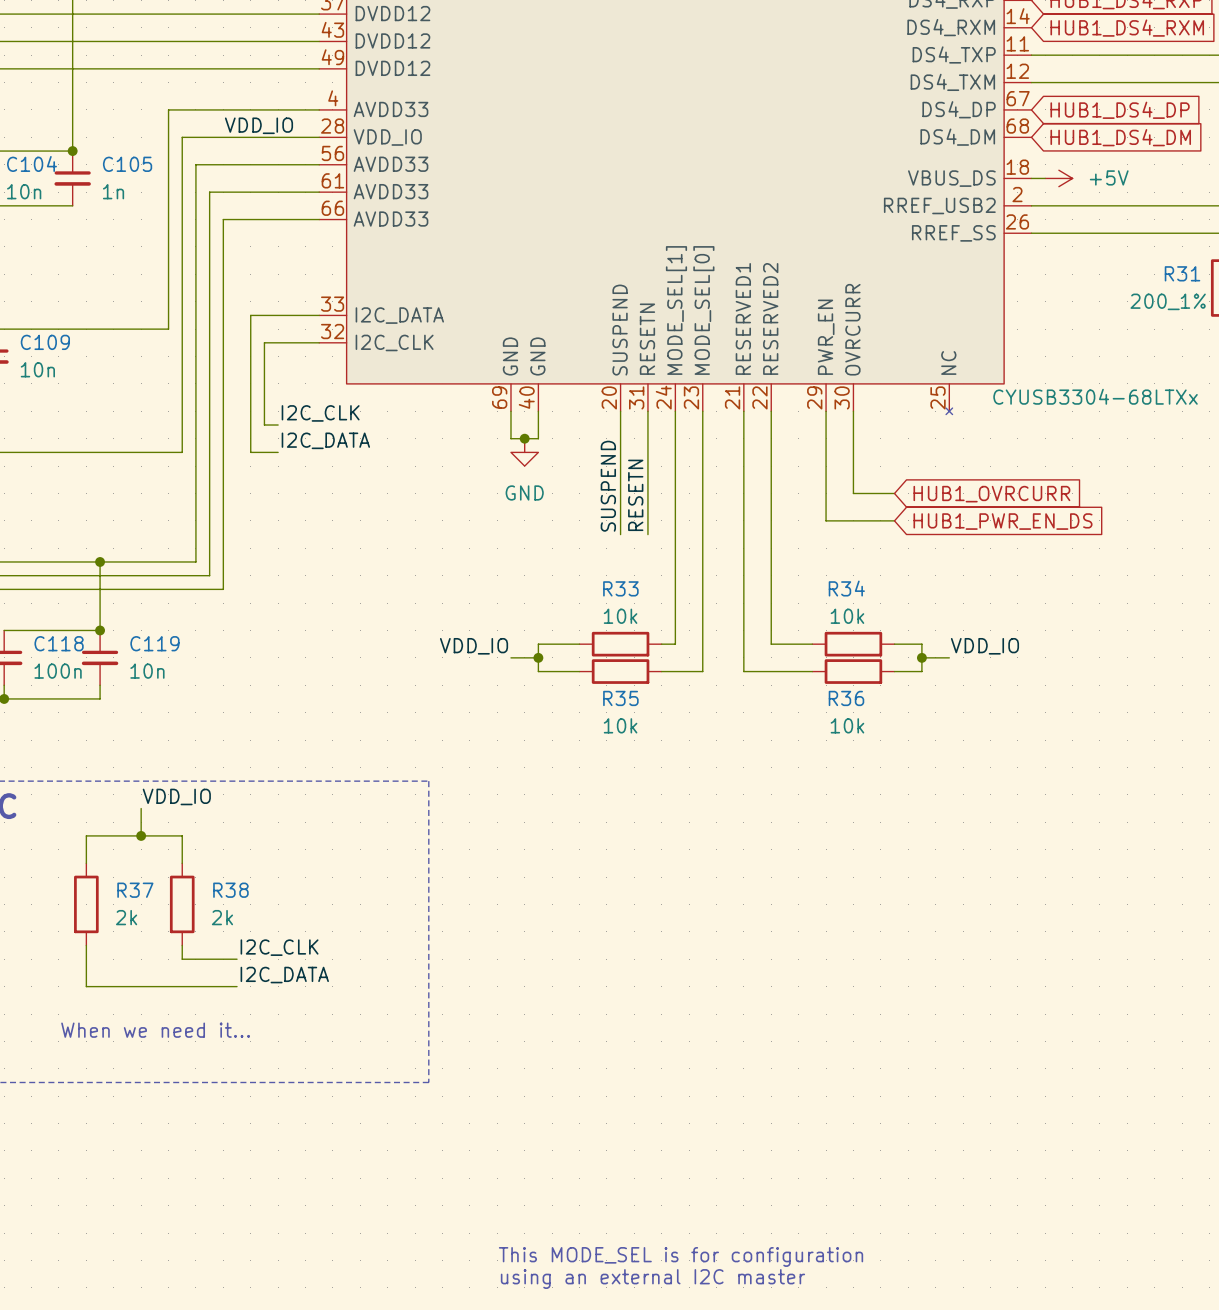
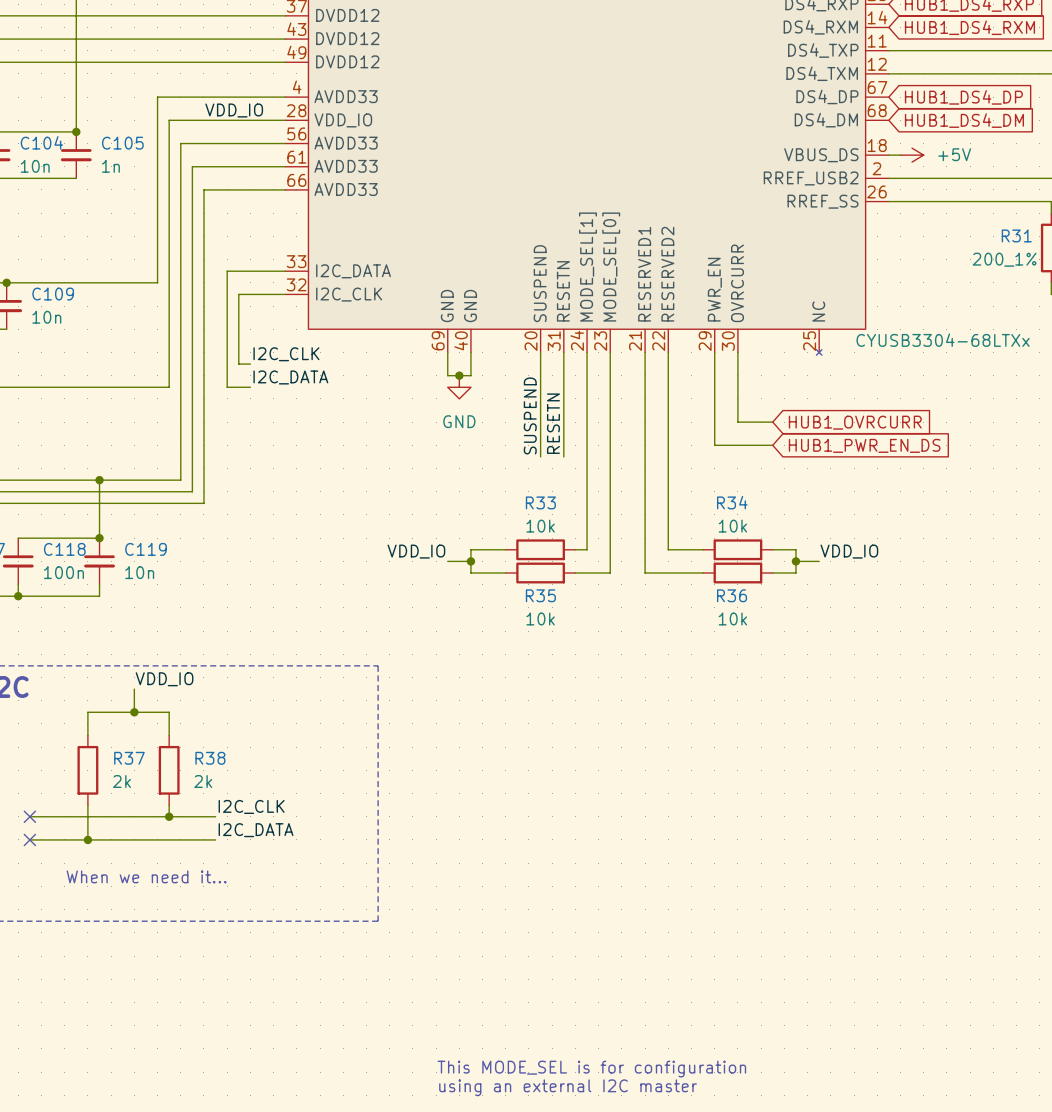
wire: none -> (29, 816) (169, 816)
no-connect mark: none -> (29, 816)
junction: none -> (169, 816)
wire: none -> (29, 839) (87, 839)
no-connect mark: none -> (29, 839)
junction: none -> (87, 839)

